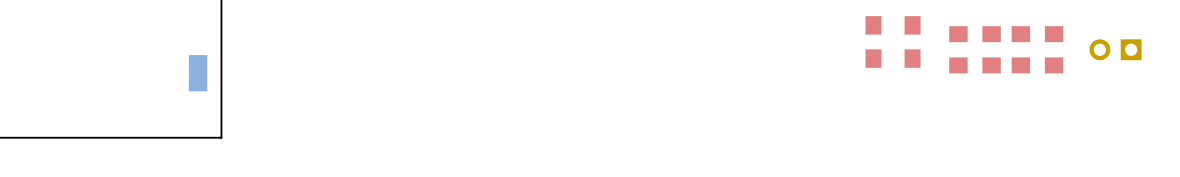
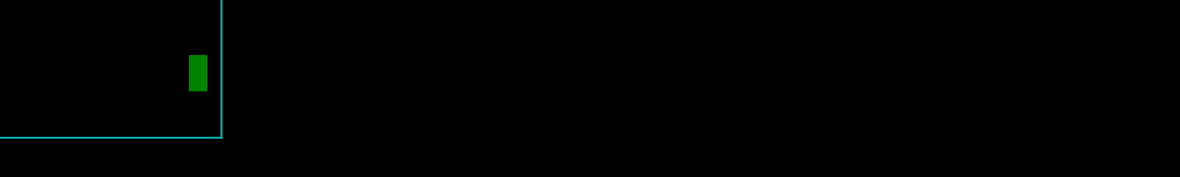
part: (975, 34) -> none
part: (1037, 34) -> none
part: (873, 41) -> none
part: (912, 41) -> none
part: (1115, 49) -> none
part: (975, 65) -> none
part: (1037, 65) -> none

